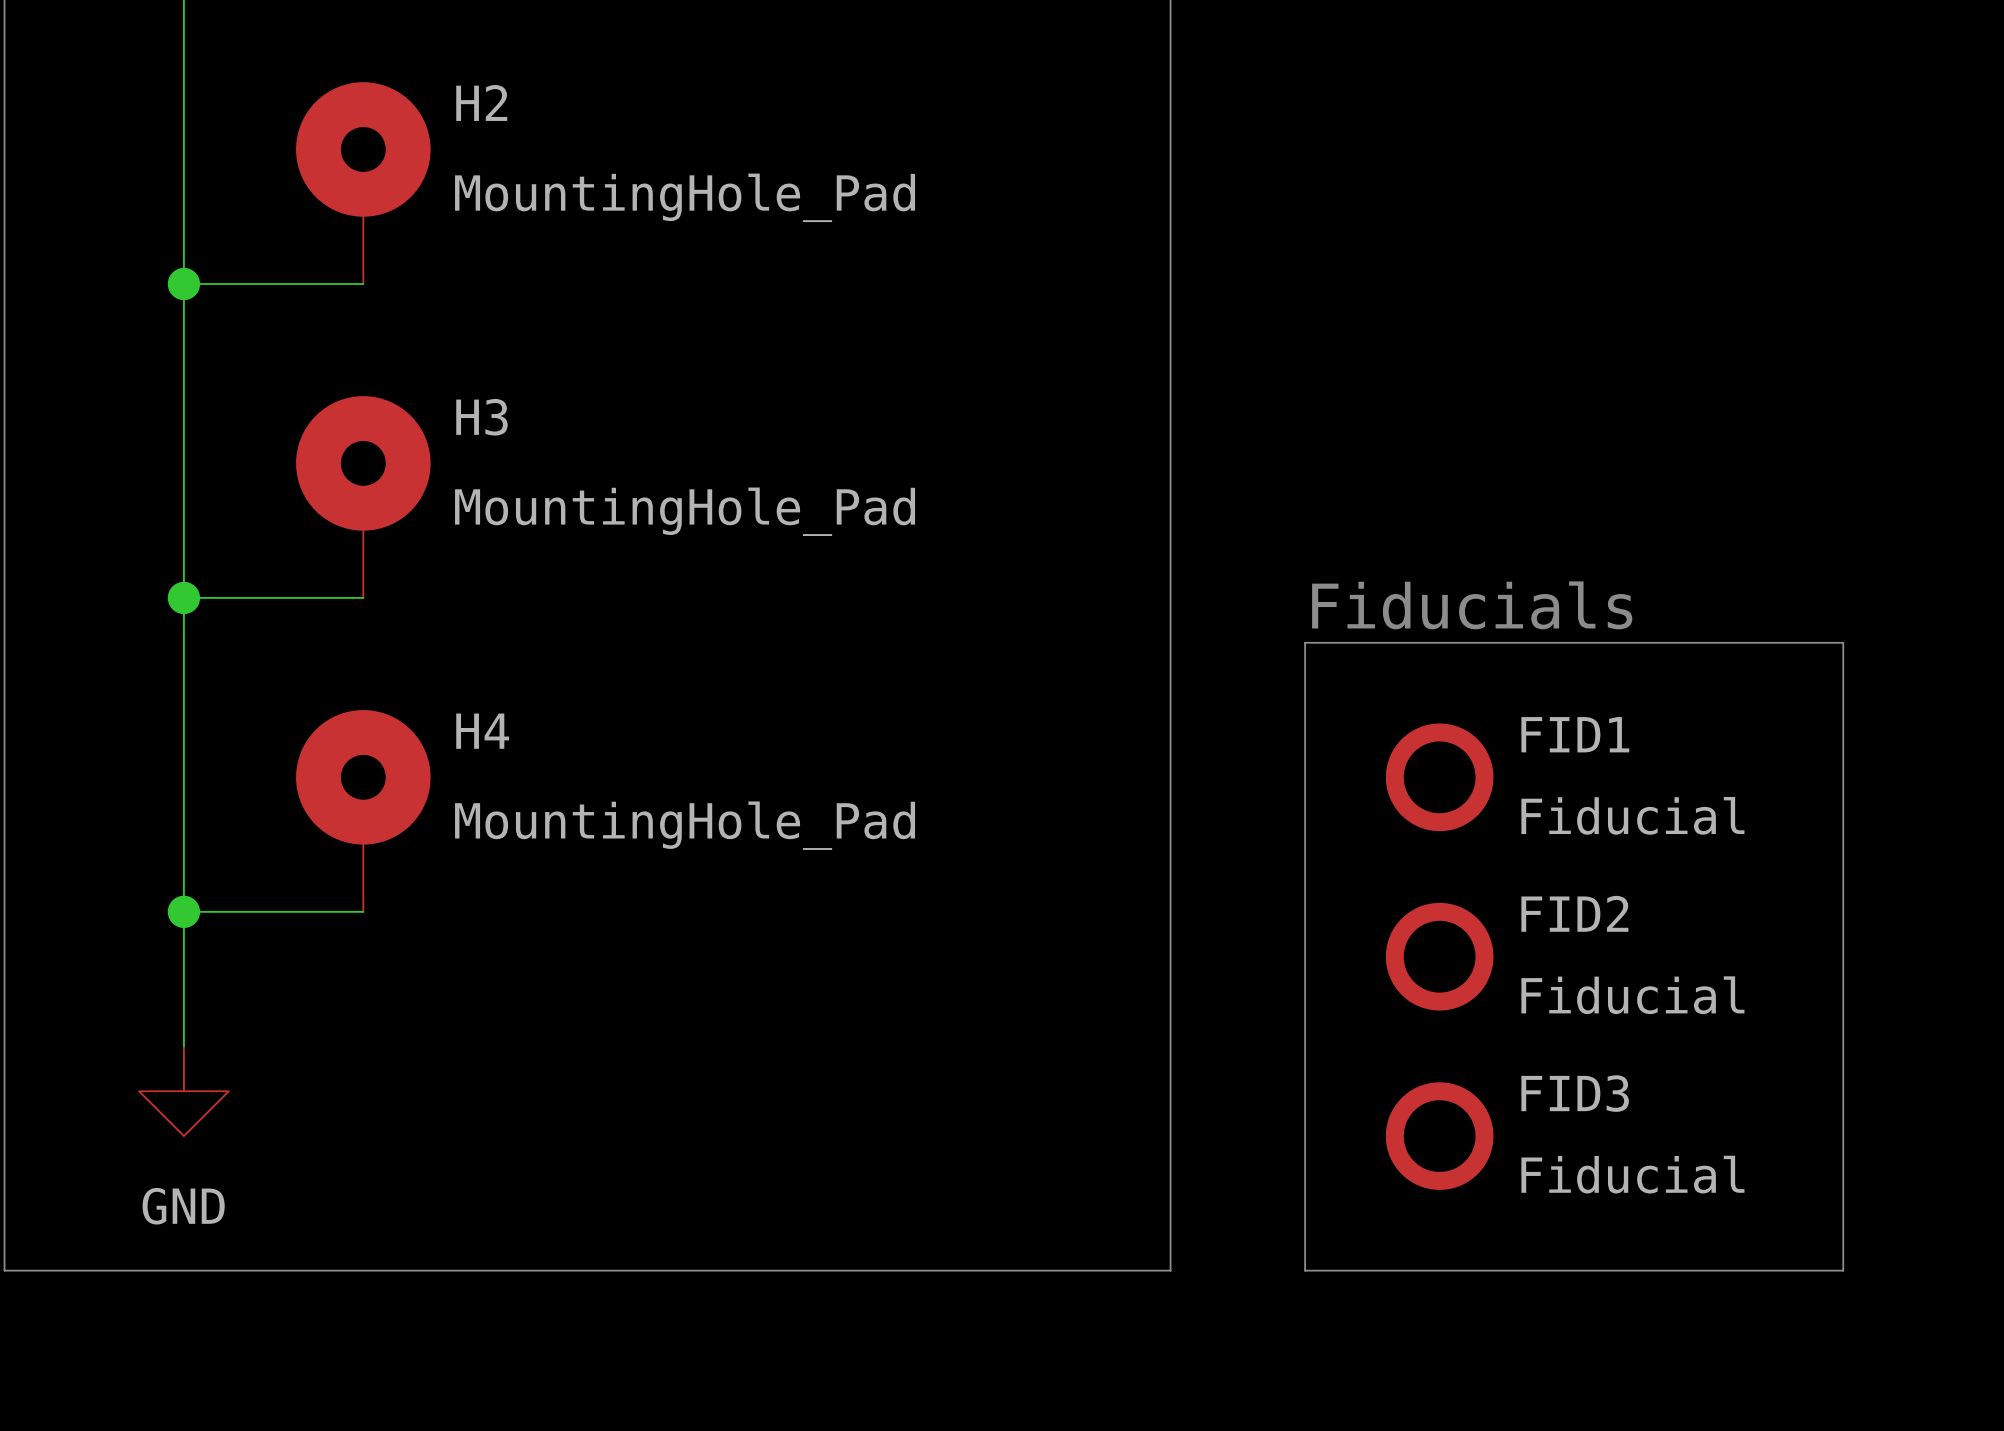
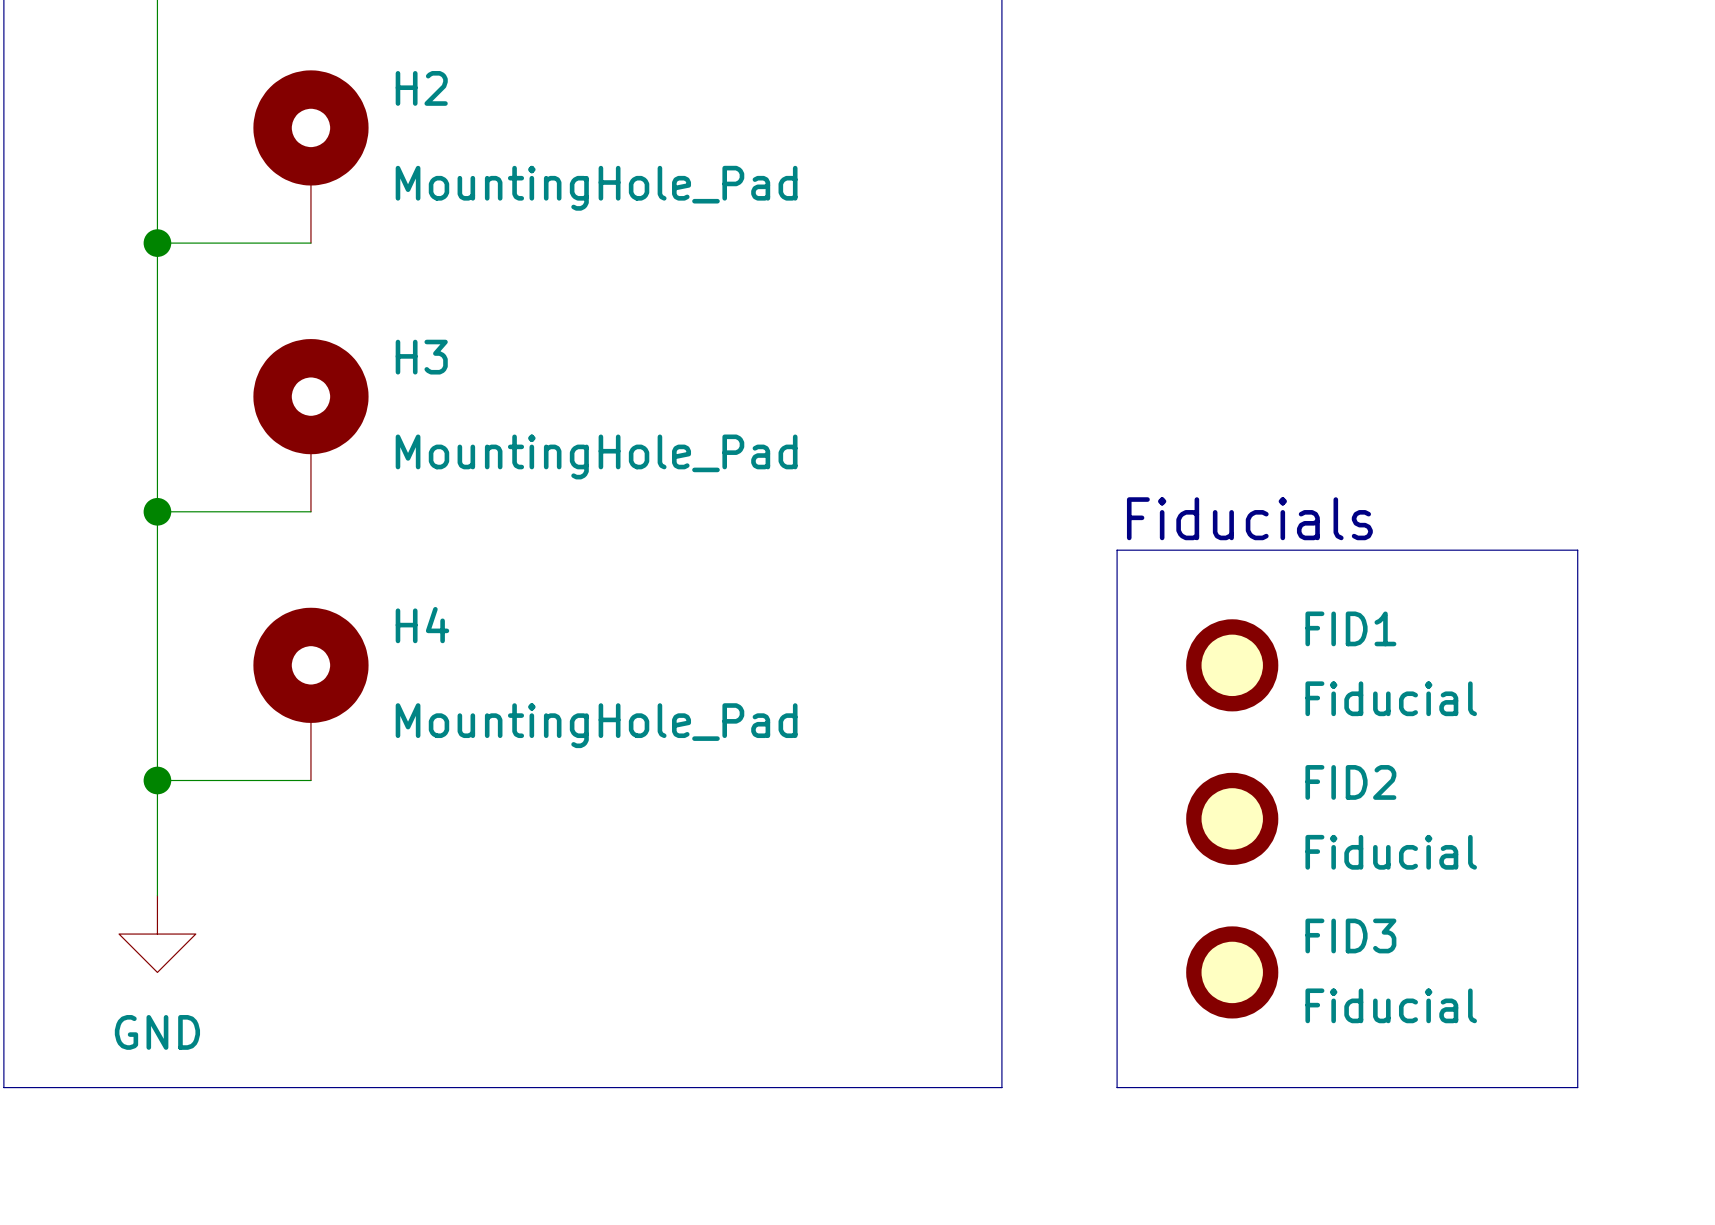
H2 value position: MountingHole_Pad (685, 197) -> MountingHole_Pad (596, 188)
H3 value position: MountingHole_Pad (685, 511) -> MountingHole_Pad (596, 456)
H4 value position: MountingHole_Pad (685, 825) -> MountingHole_Pad (596, 725)

